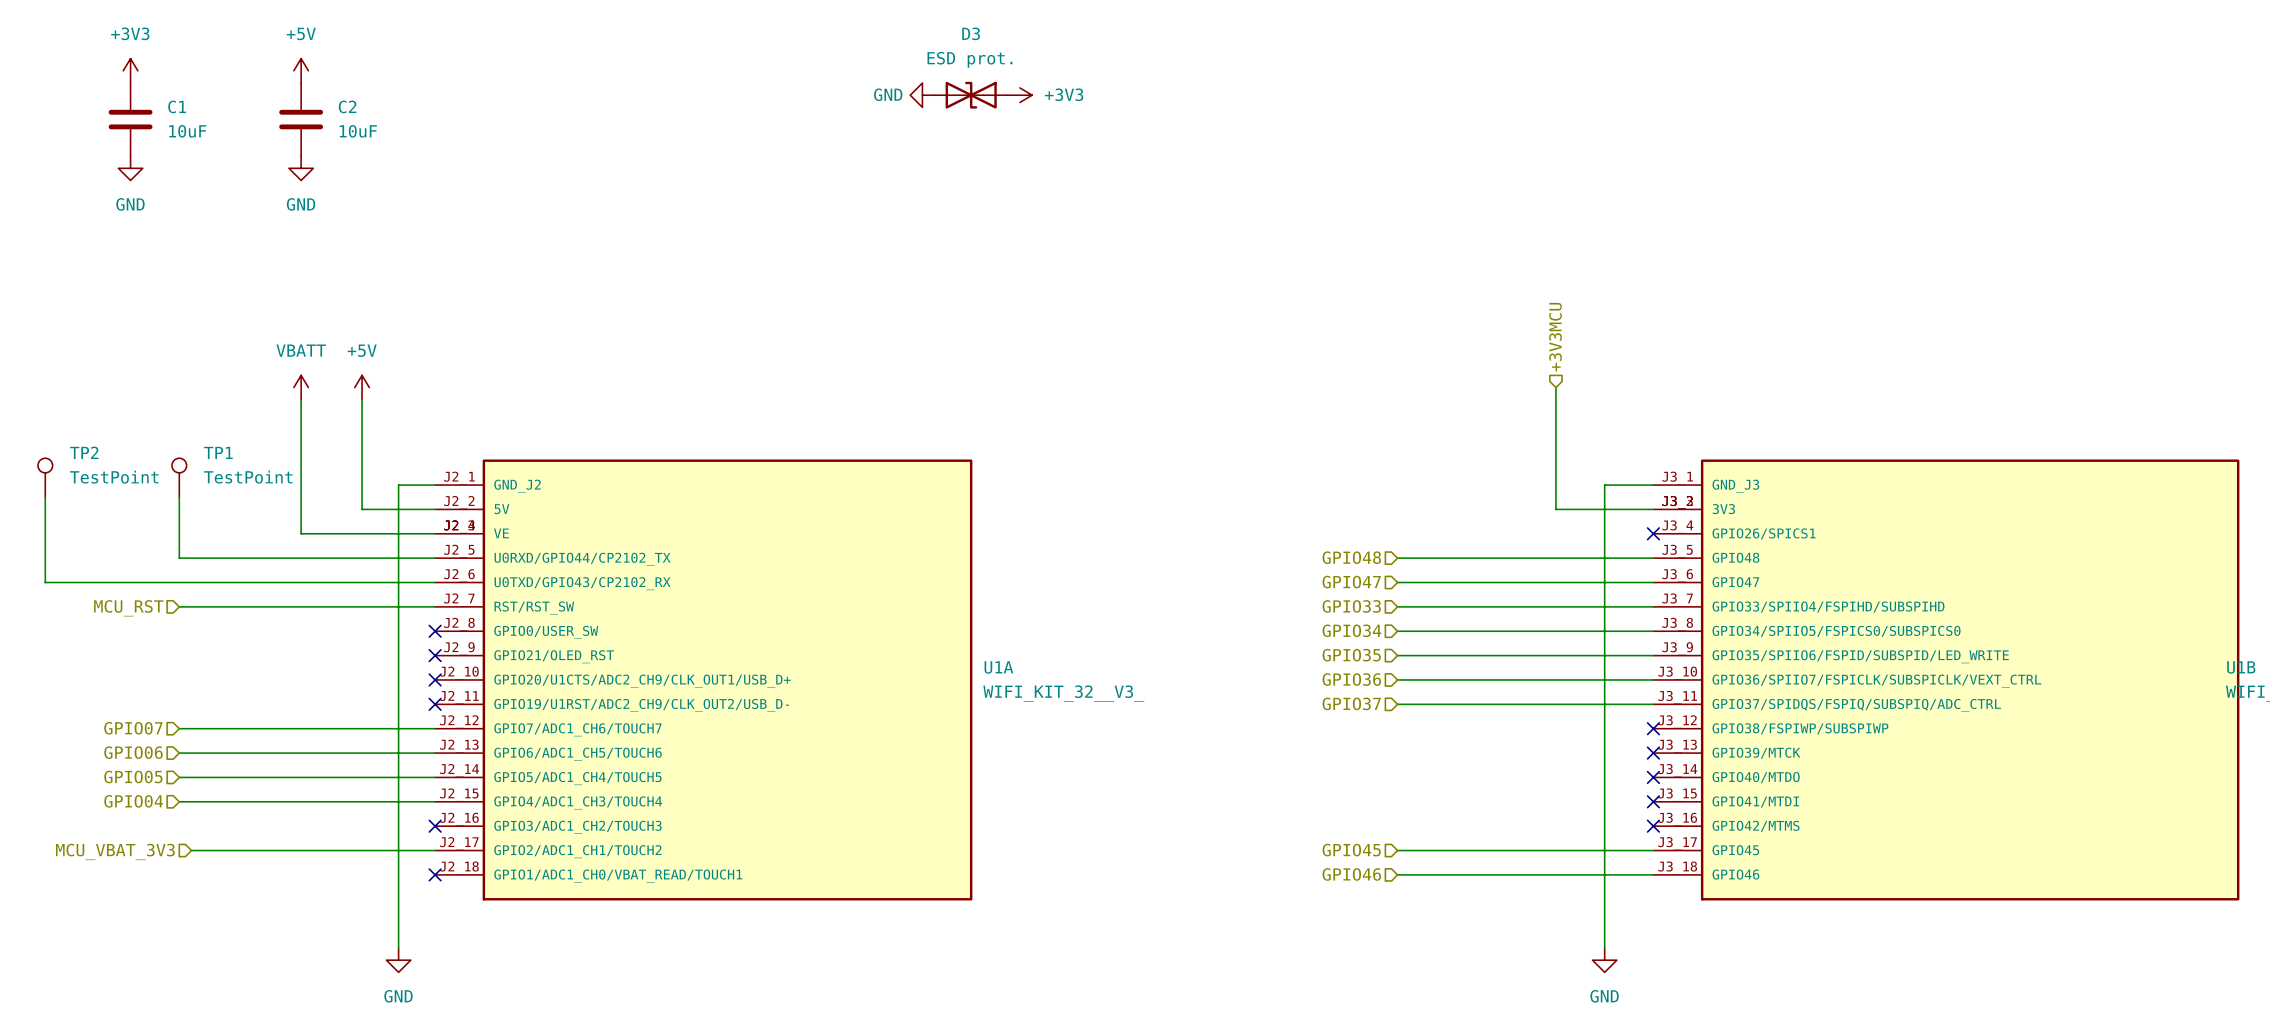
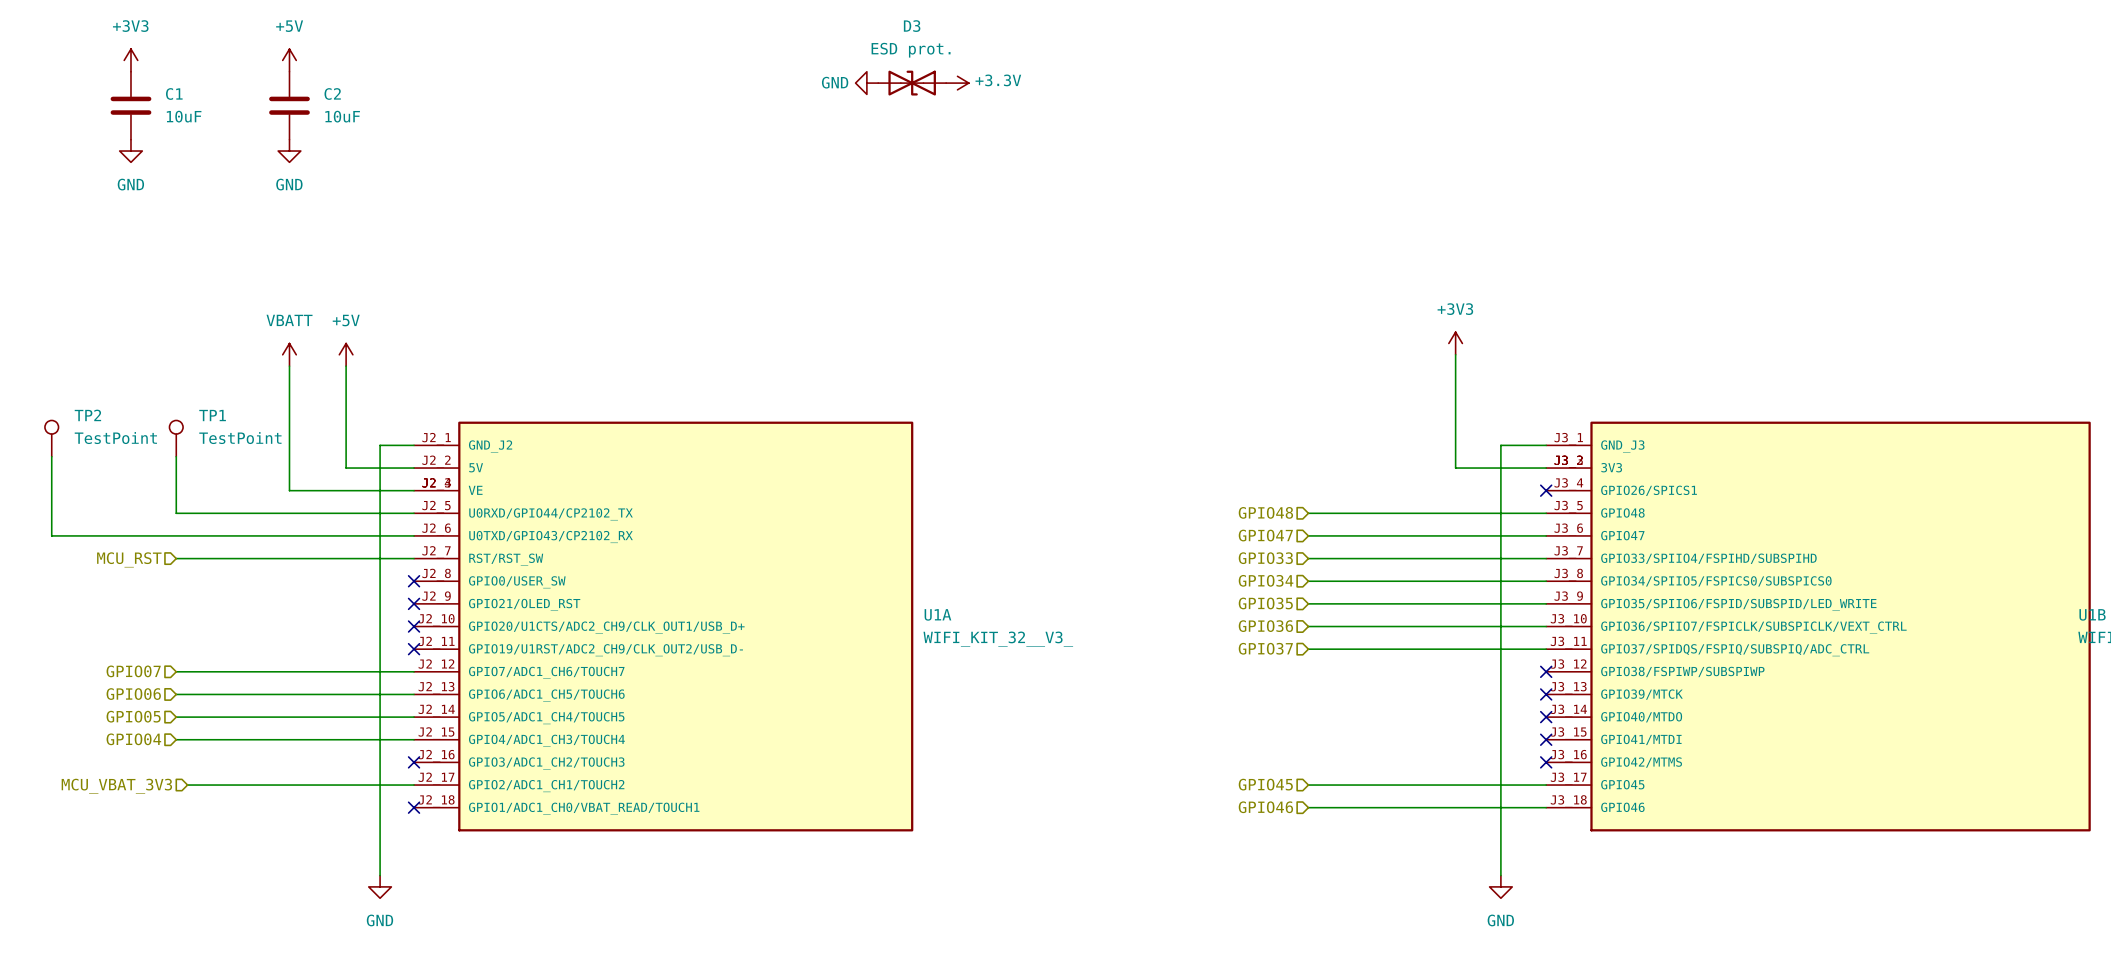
power symbol: +3V3 (1019, 95) -> +3.3V (957, 83)
hierarchical label: +3V3MCU (1555, 337) -> none
power symbol: none -> +3V3 (1455, 343)

